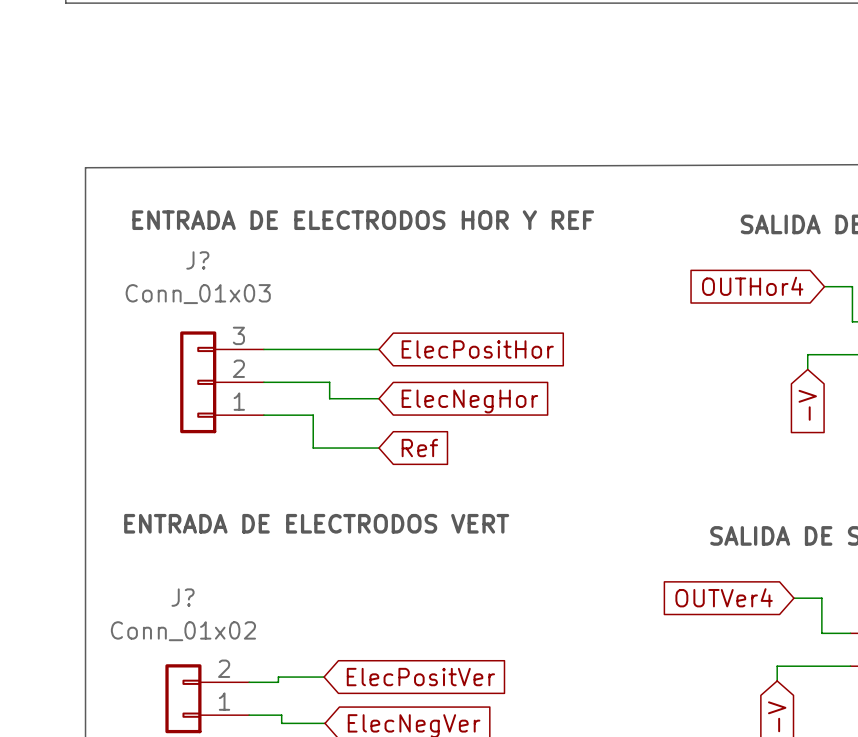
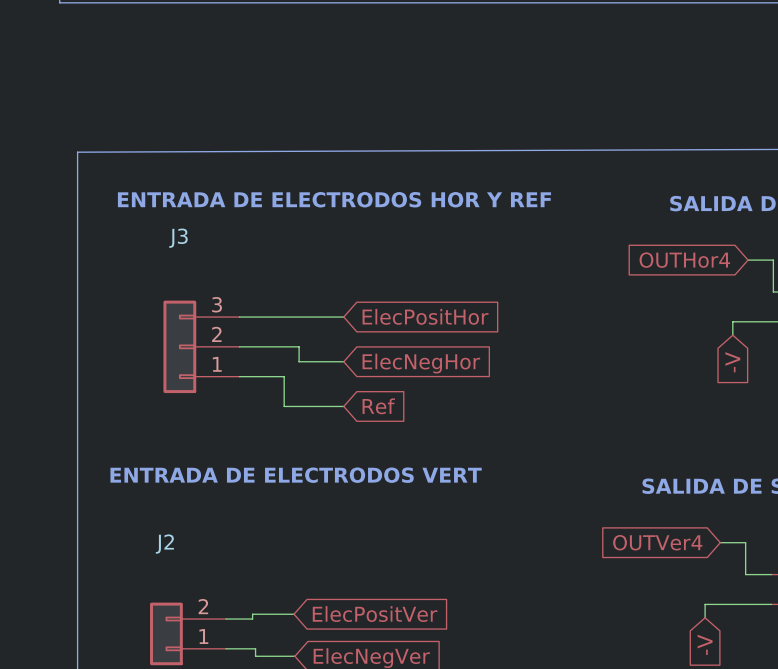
J? name: J? (197, 260) -> J3 (178, 238)
J? value: Conn_01x03 (198, 294) -> none
J? name: J? (183, 597) -> J2 (164, 544)
J? value: Conn_01x02 (183, 631) -> none

